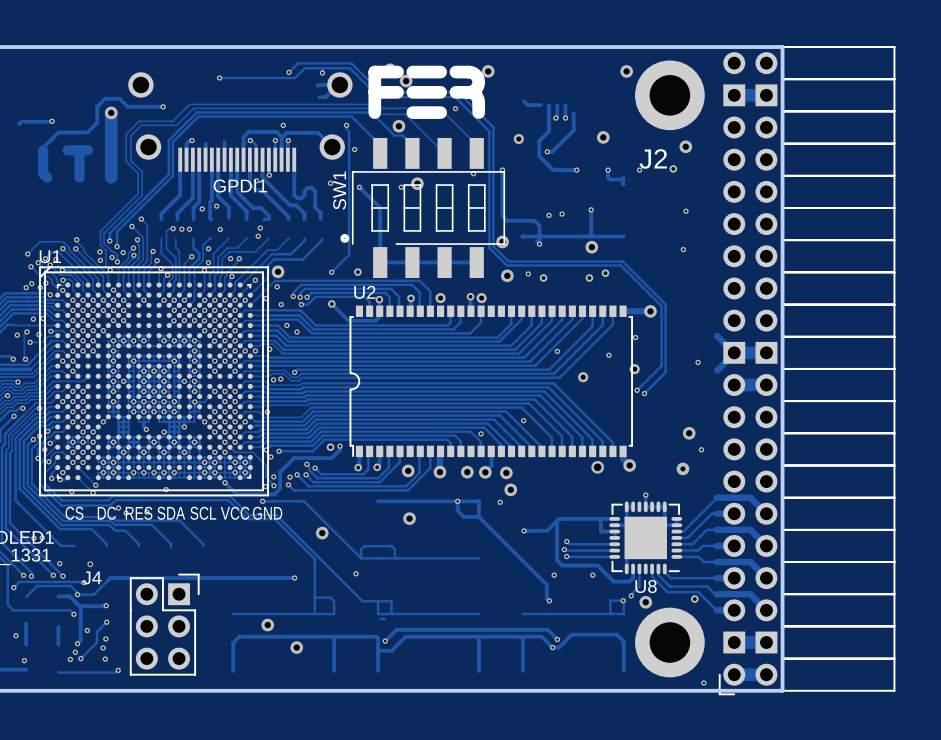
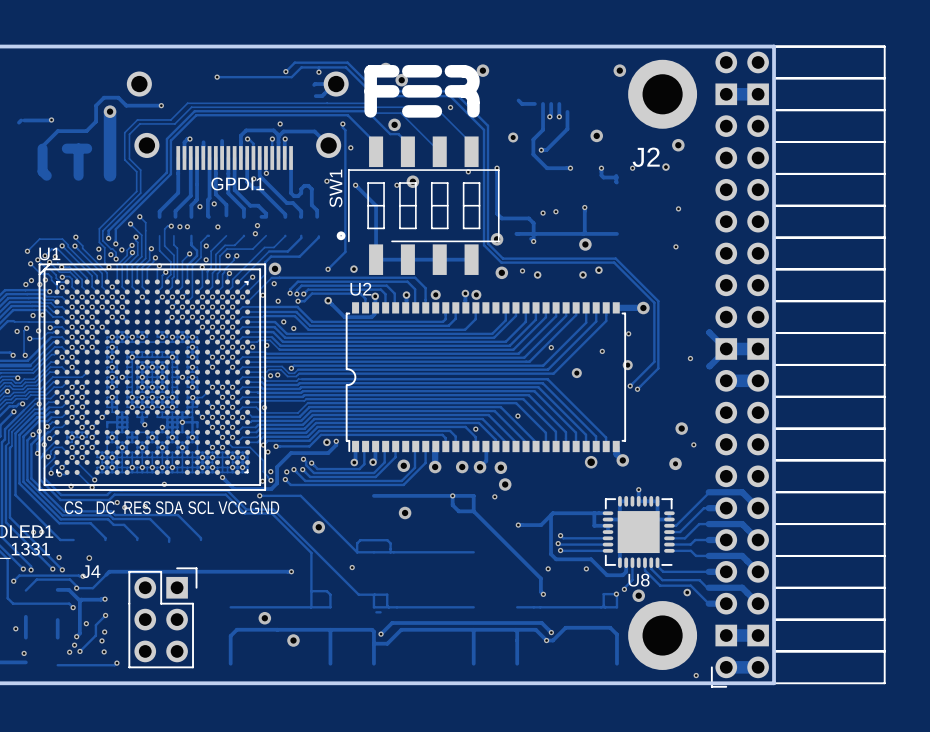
track: none -> (192, 417) (192, 432)
track: none -> (117, 422) (107, 422) (107, 427)
track: none -> (197, 427) (197, 422) (182, 422) (182, 432)

